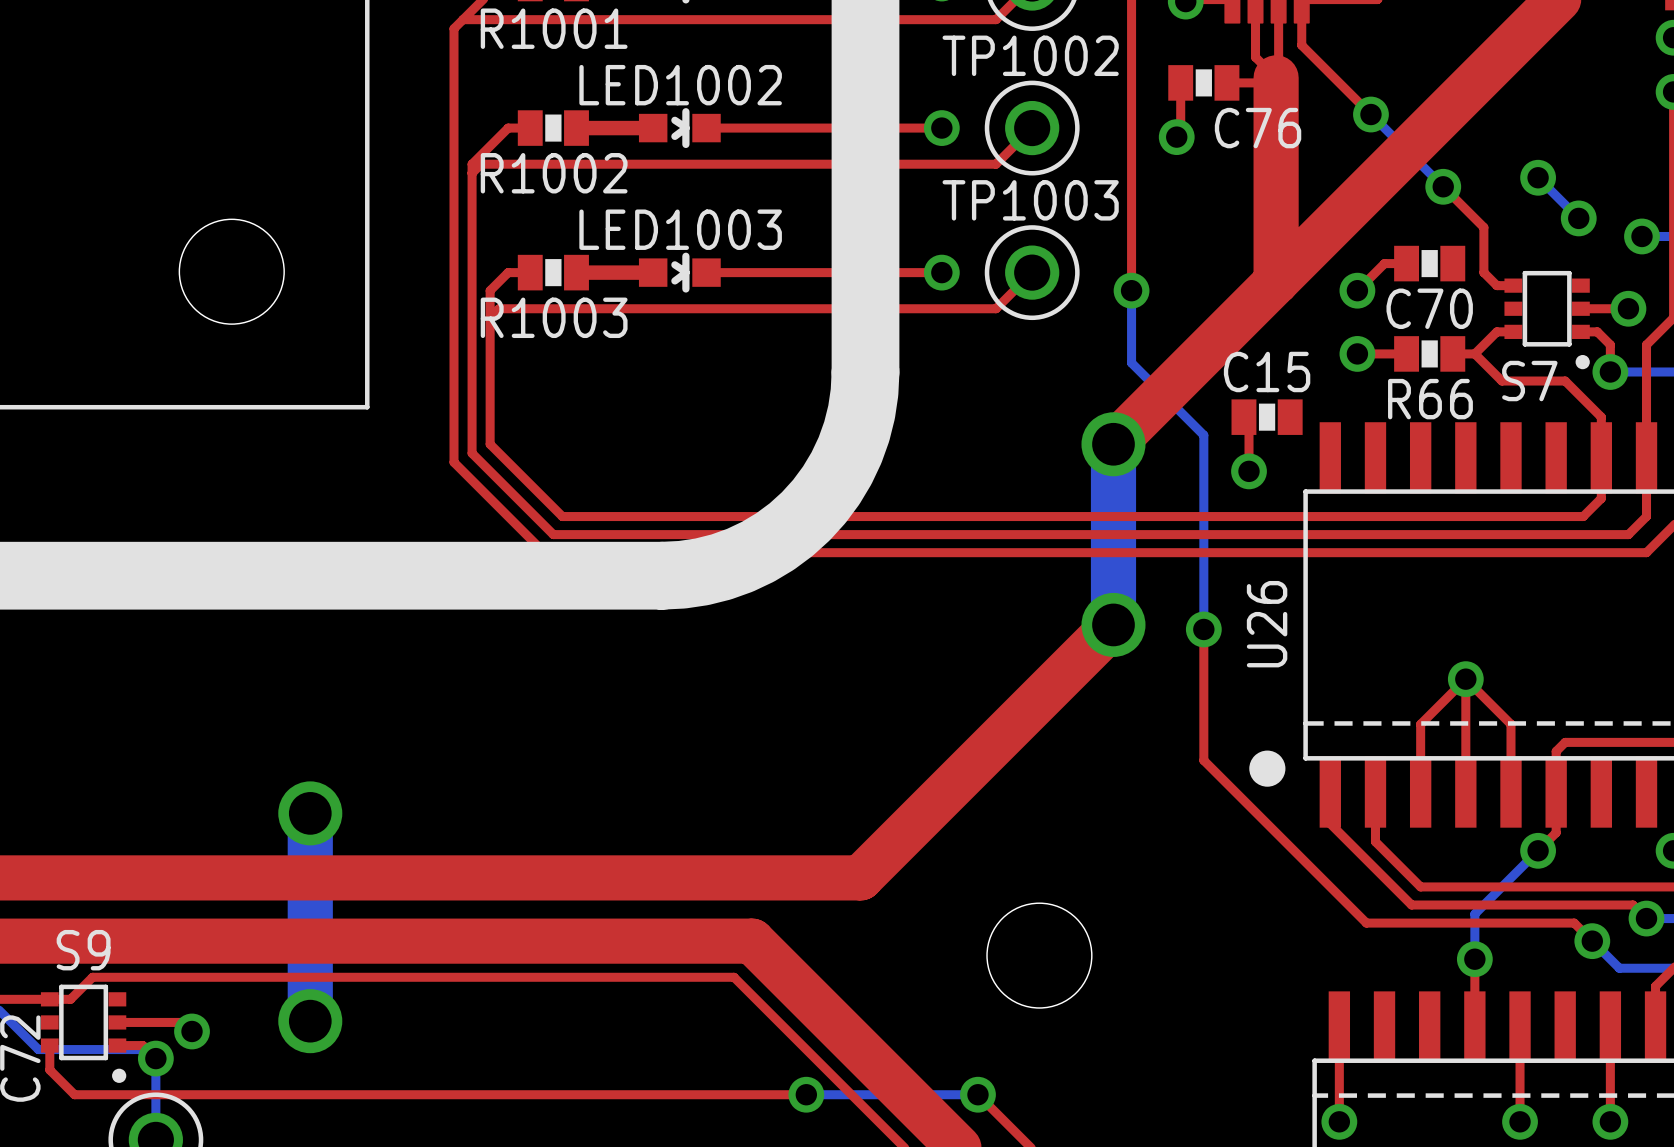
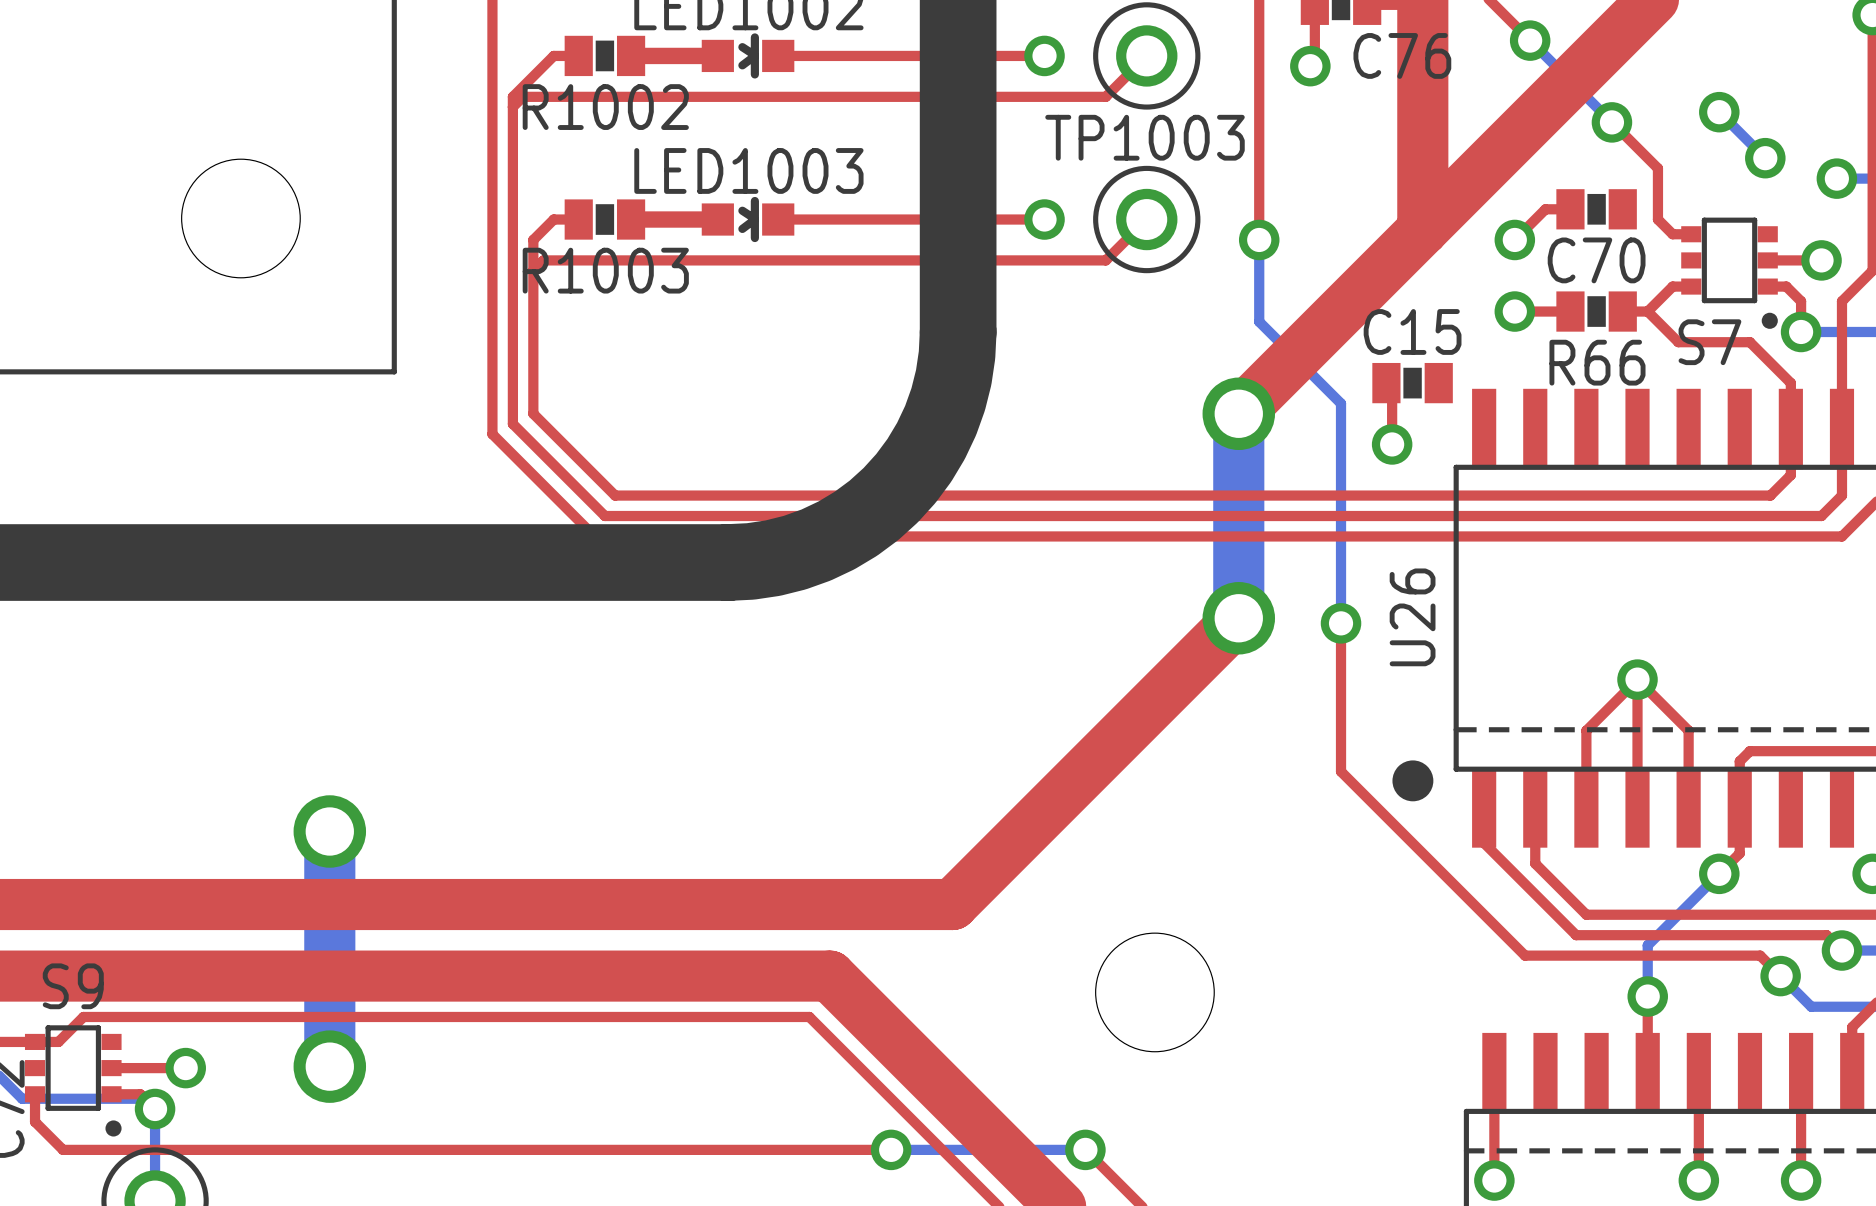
via position: (192, 1031) -> (185, 1068)

